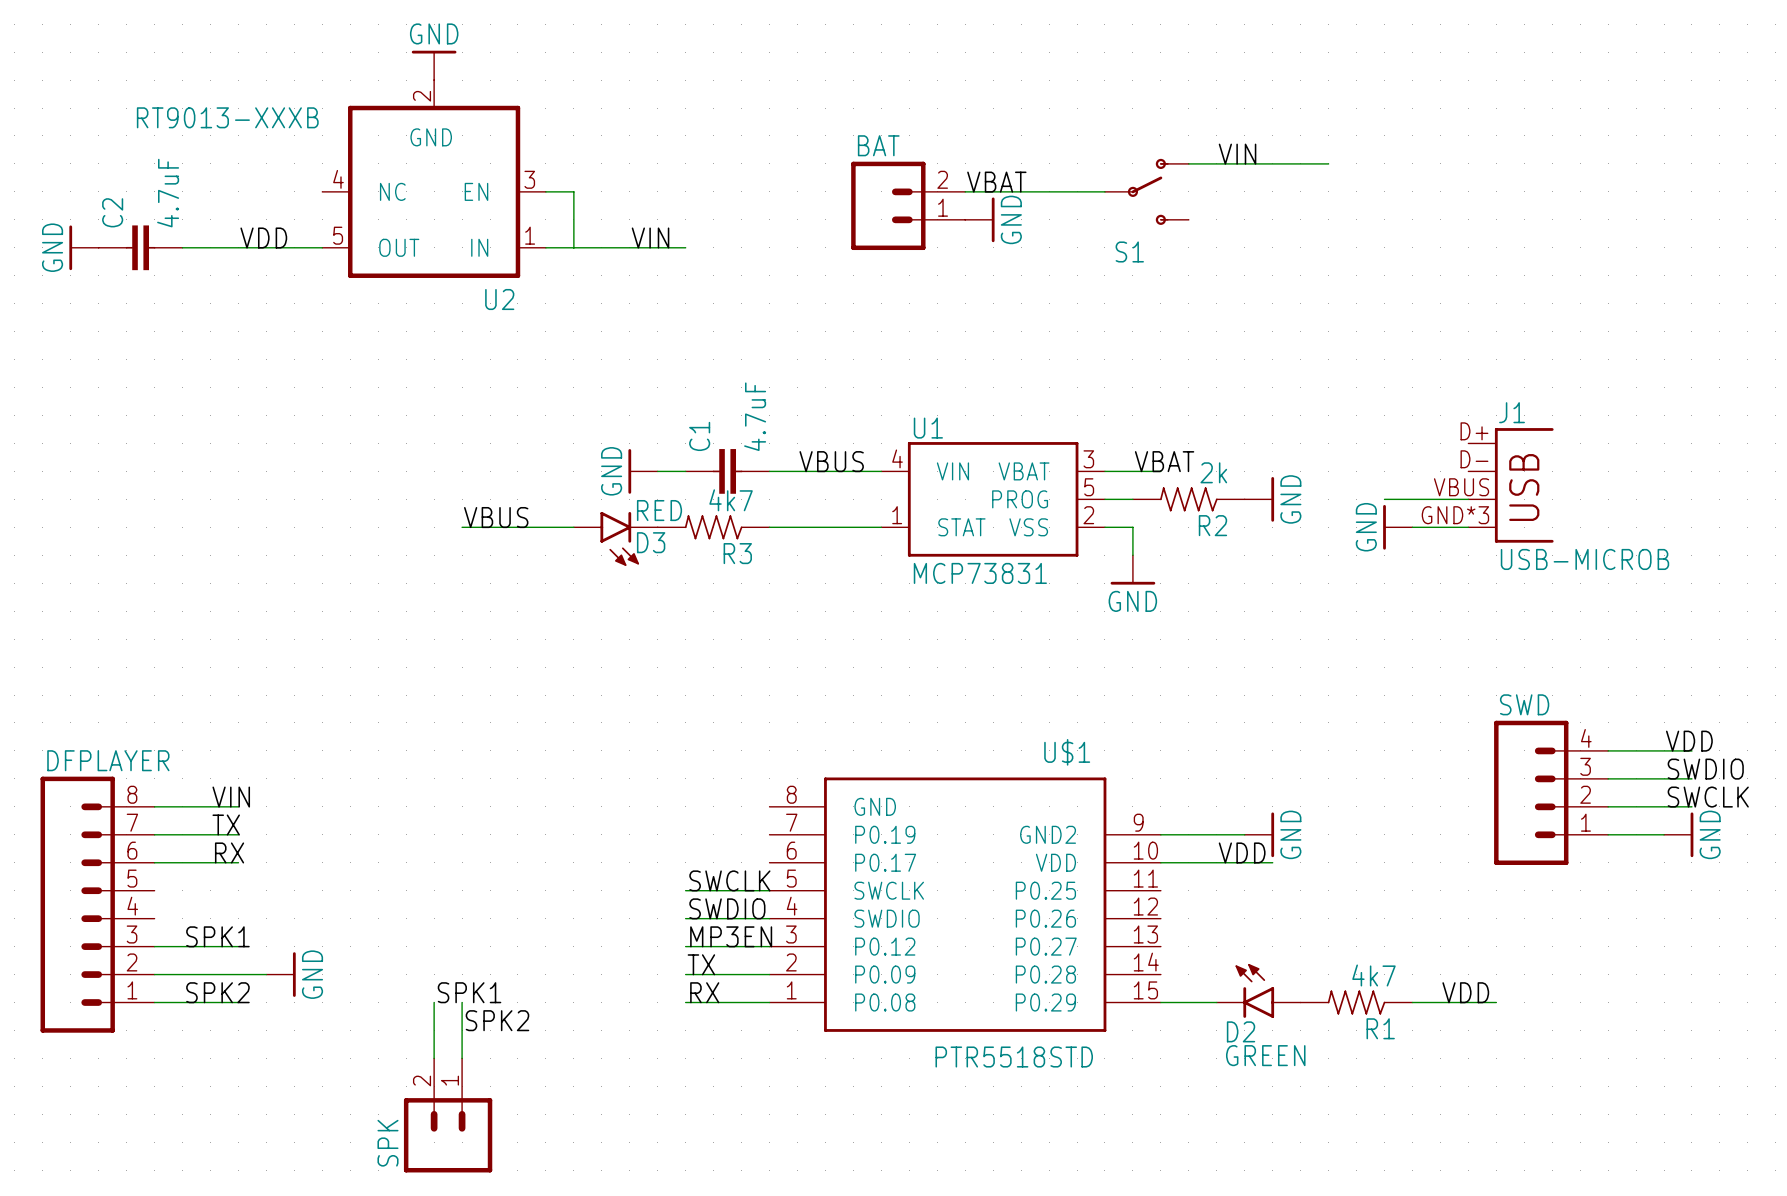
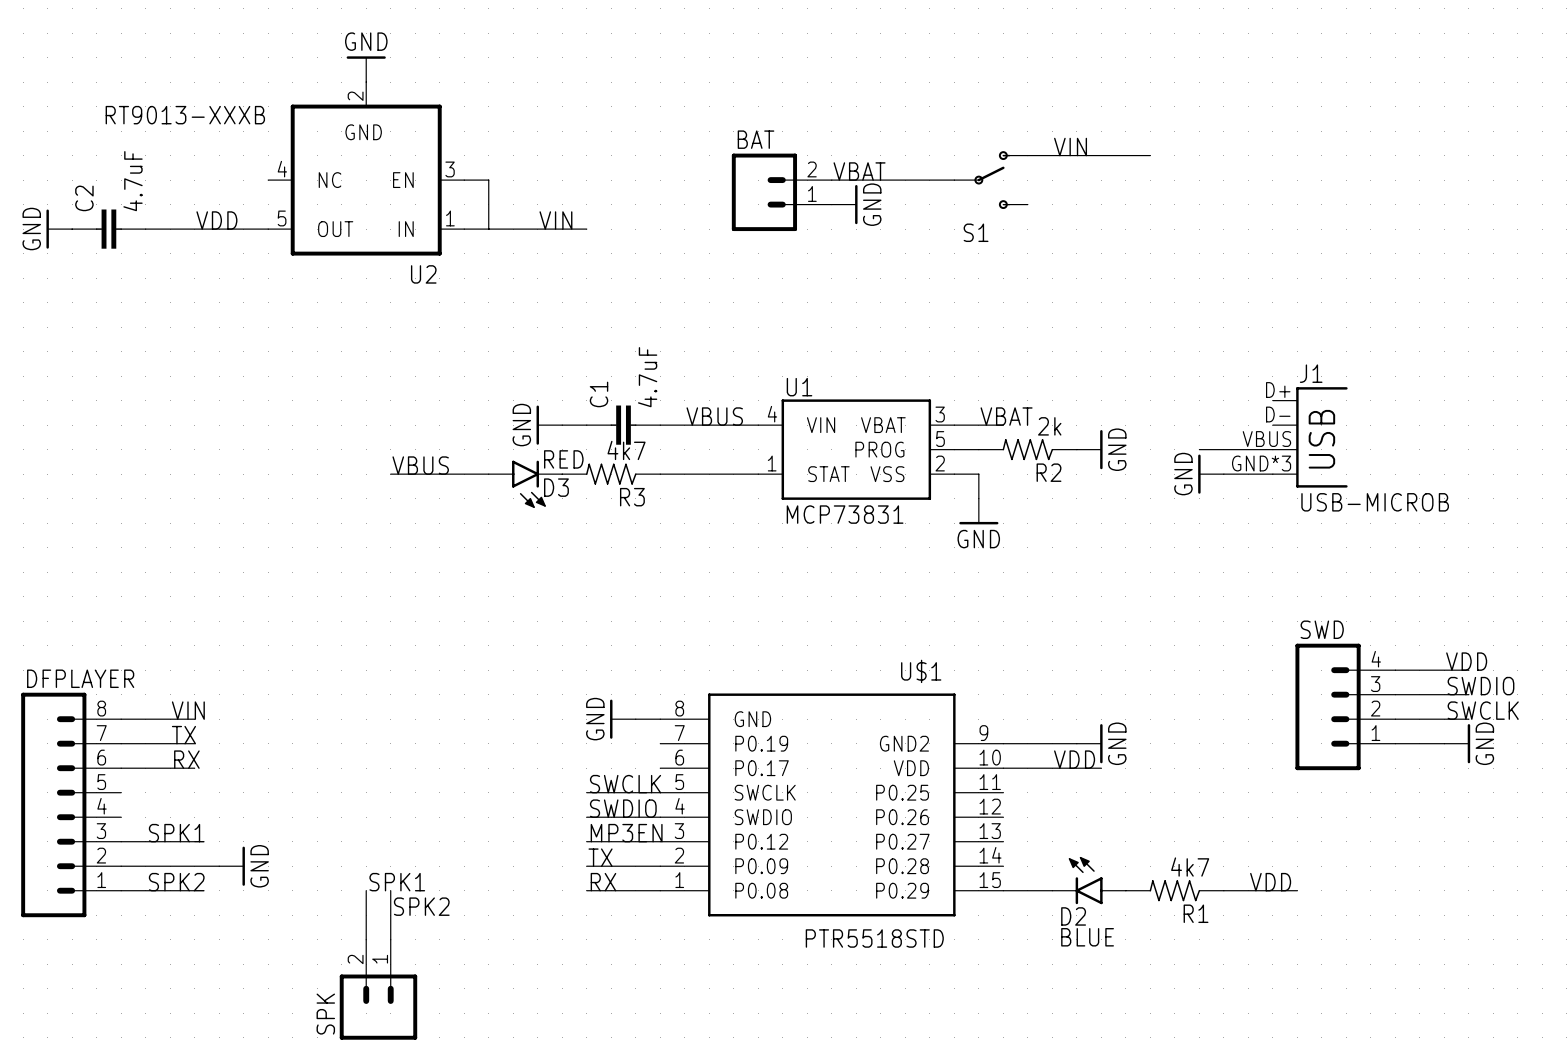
power symbol: none -> GND (622, 719)
wire: none -> (635, 719) (660, 719)
D2 value: GREEN (1265, 1055) -> BLUE (1087, 937)

